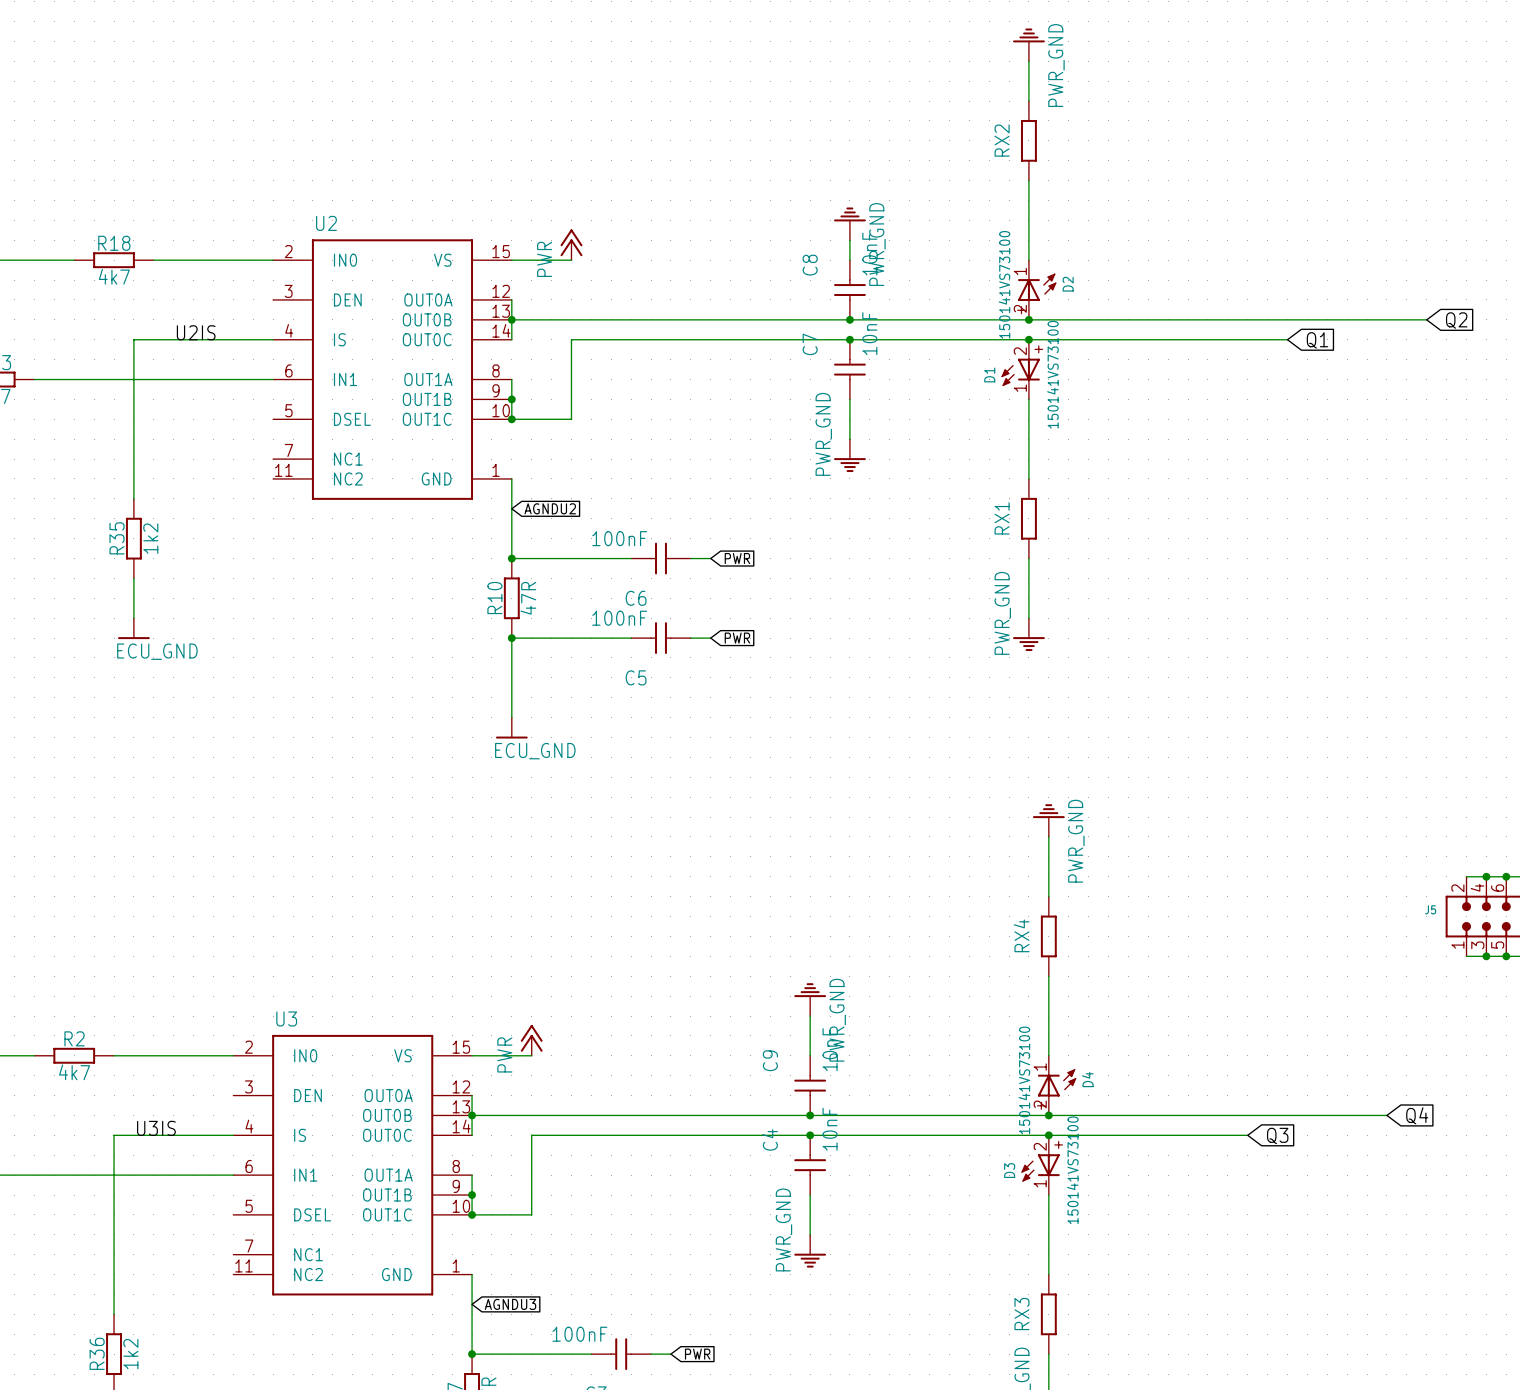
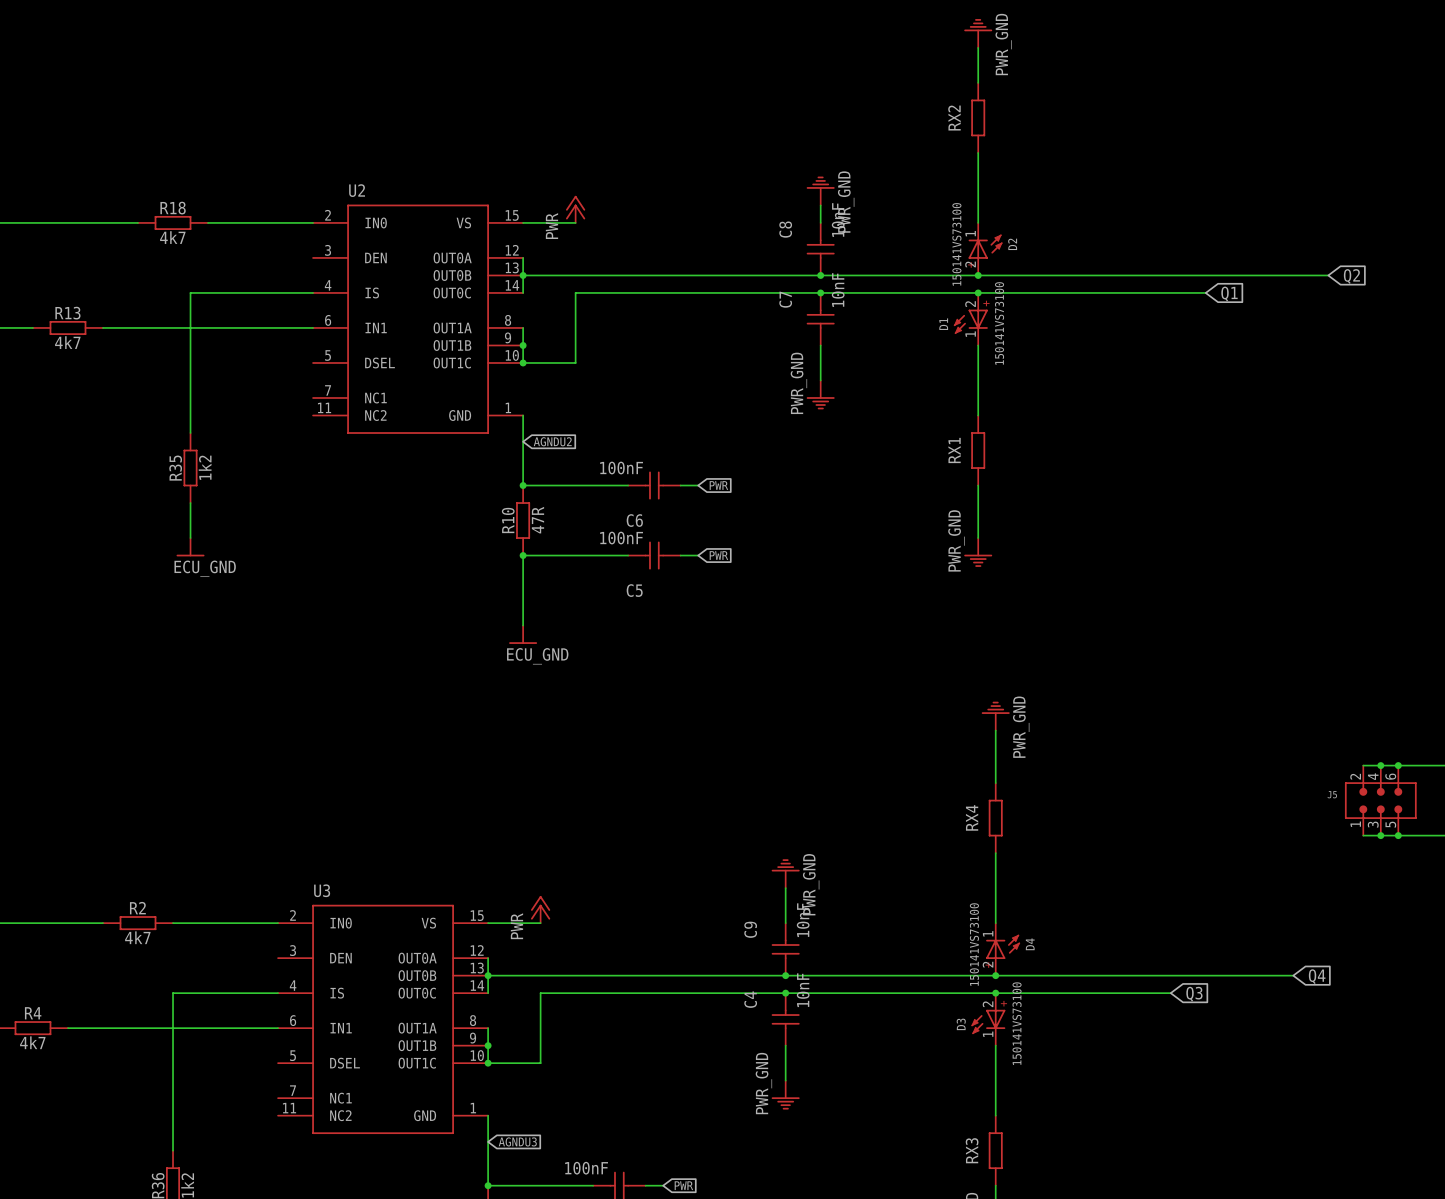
label: U2IS (196, 332) -> none
label: U3IS (156, 1128) -> none

